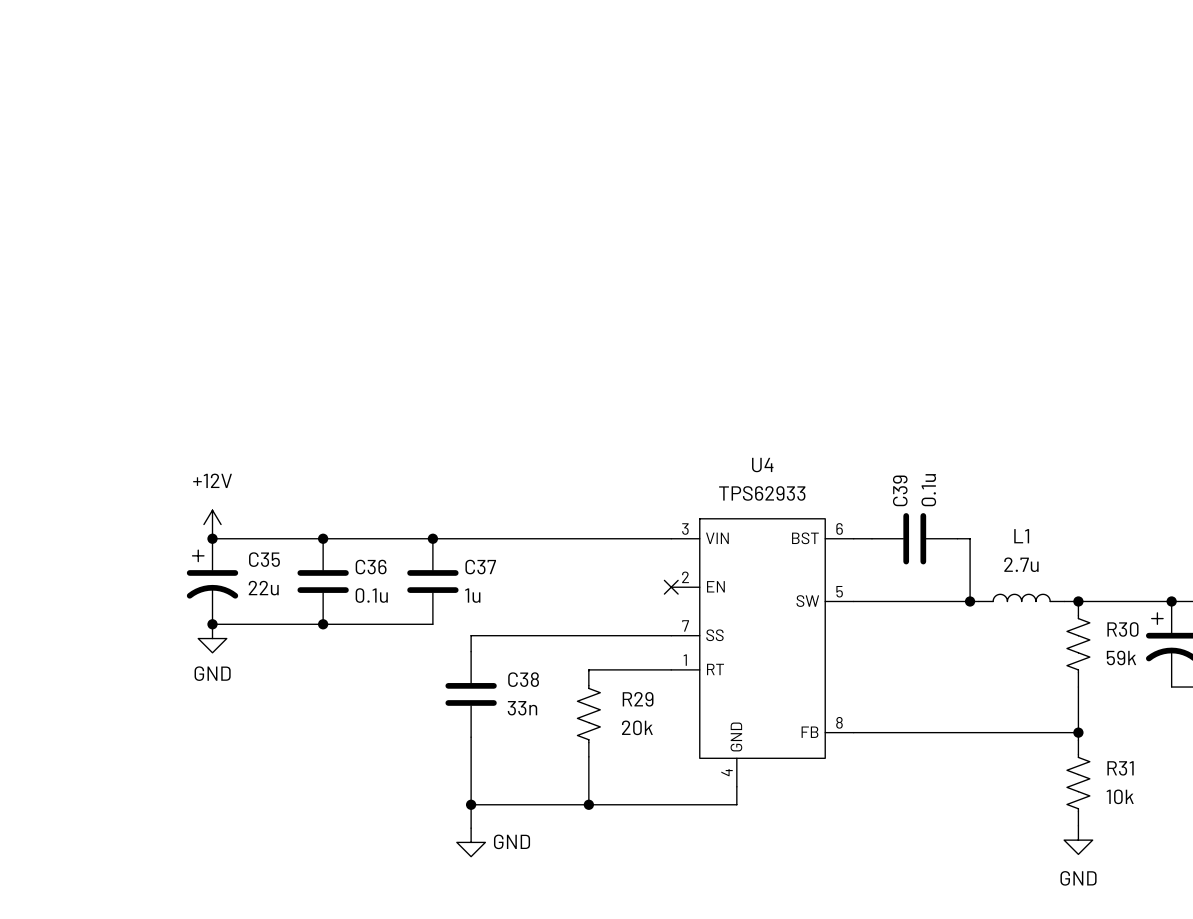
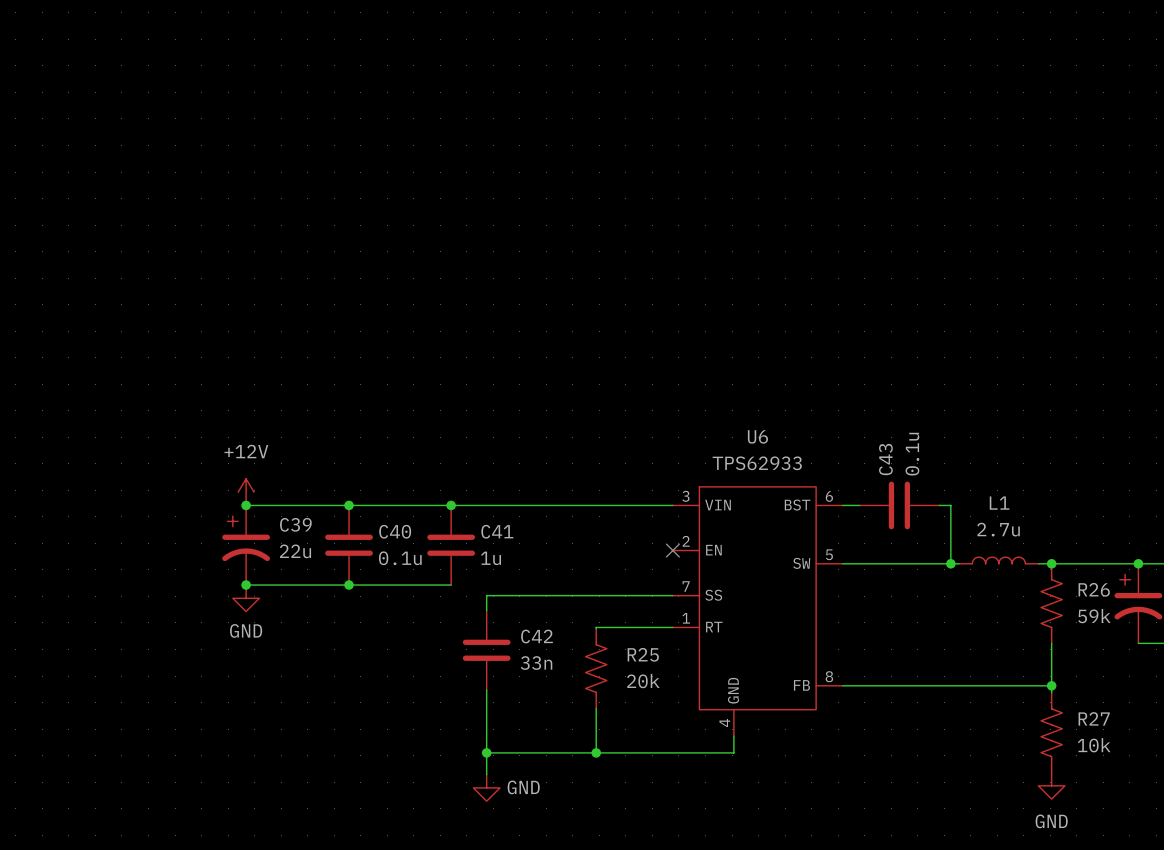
U4 name: U4 (762, 465) -> U6 (757, 436)
C39 name: C39 (900, 490) -> C43 (885, 459)
C35 name: C35 (264, 559) -> C39 (295, 524)
C36 name: C36 (371, 567) -> C40 (395, 531)
C37 name: C37 (480, 567) -> C41 (497, 531)
R30 name: R30 (1122, 629) -> R26 (1094, 589)
C38 name: C38 (523, 679) -> C42 (537, 636)
R29 name: R29 (638, 699) -> R25 (643, 654)
R31 name: R31 (1120, 768) -> R27 (1094, 718)

